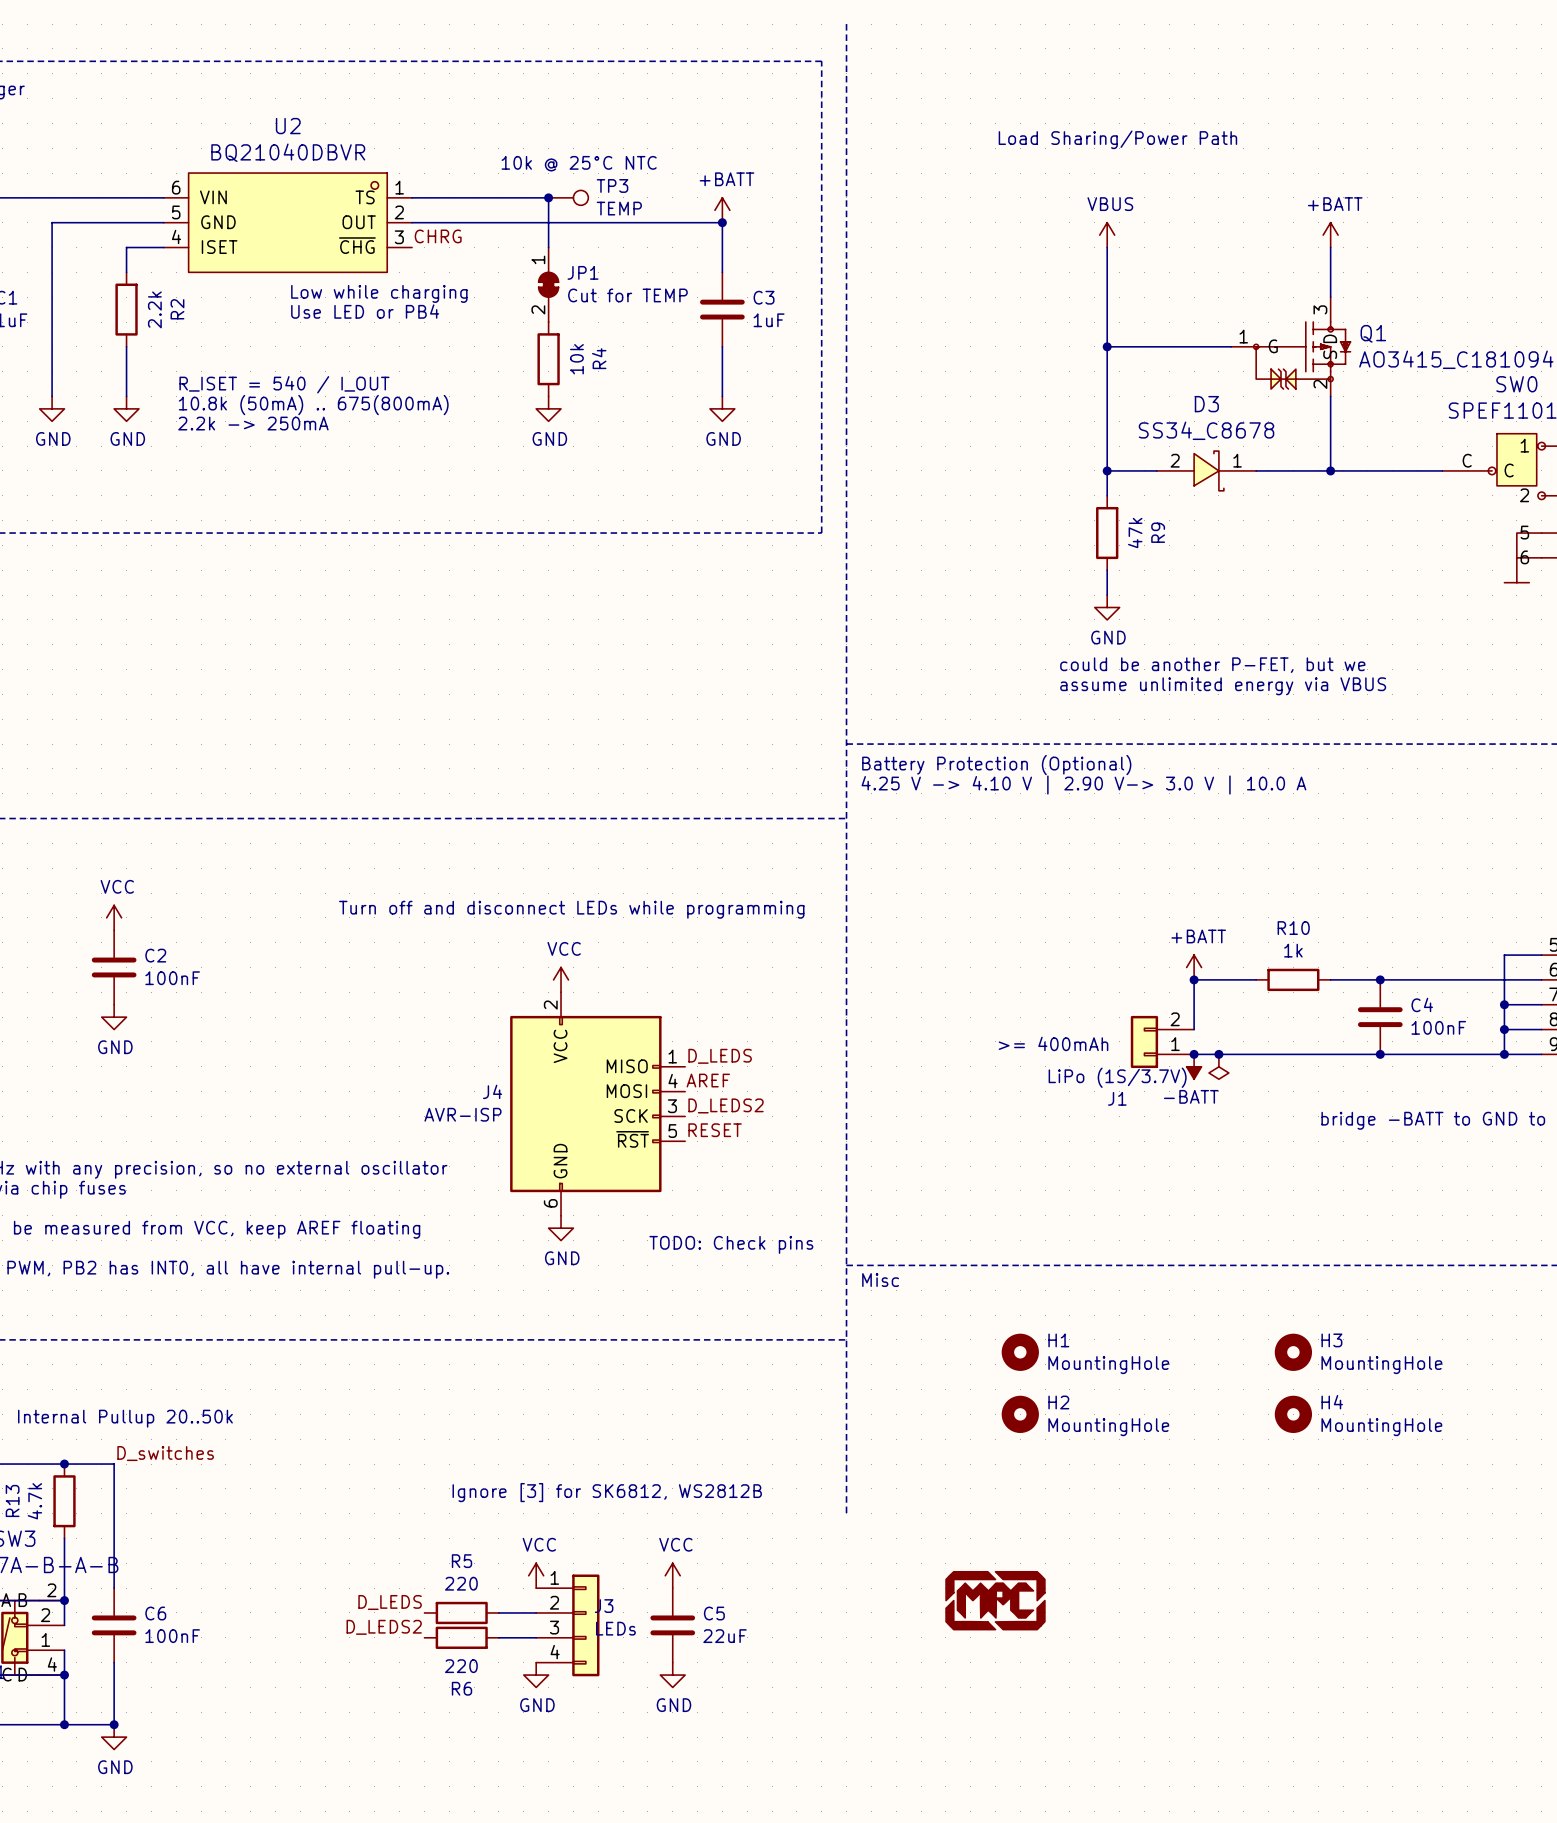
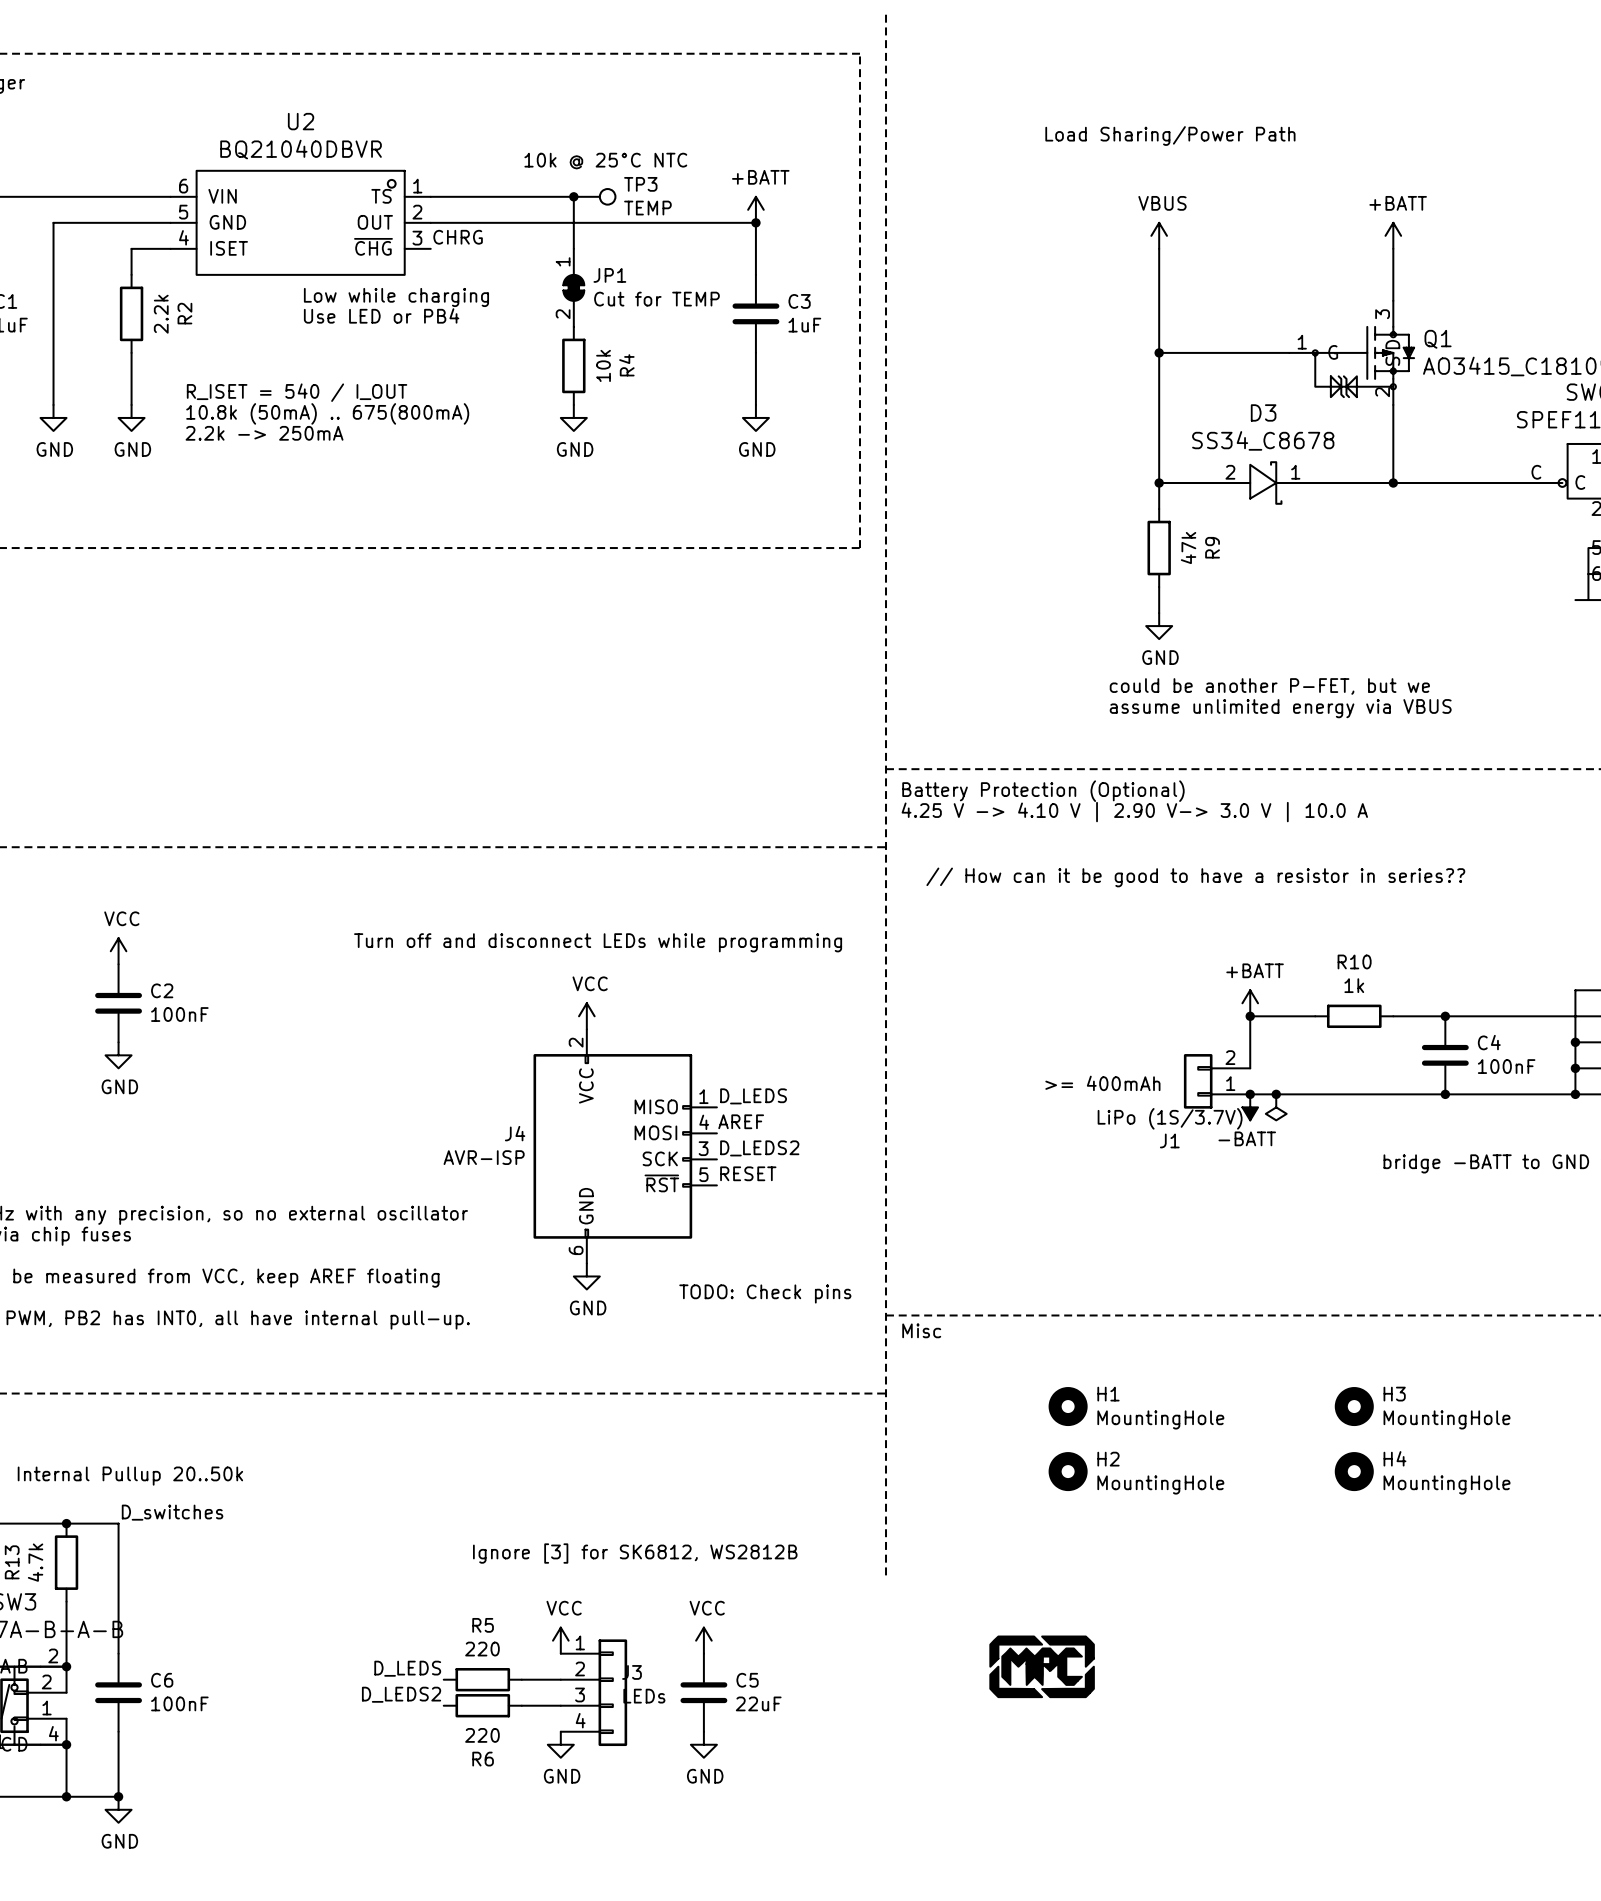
text: none -> // How can it be good to have a resistor in series?? (1195, 877)

